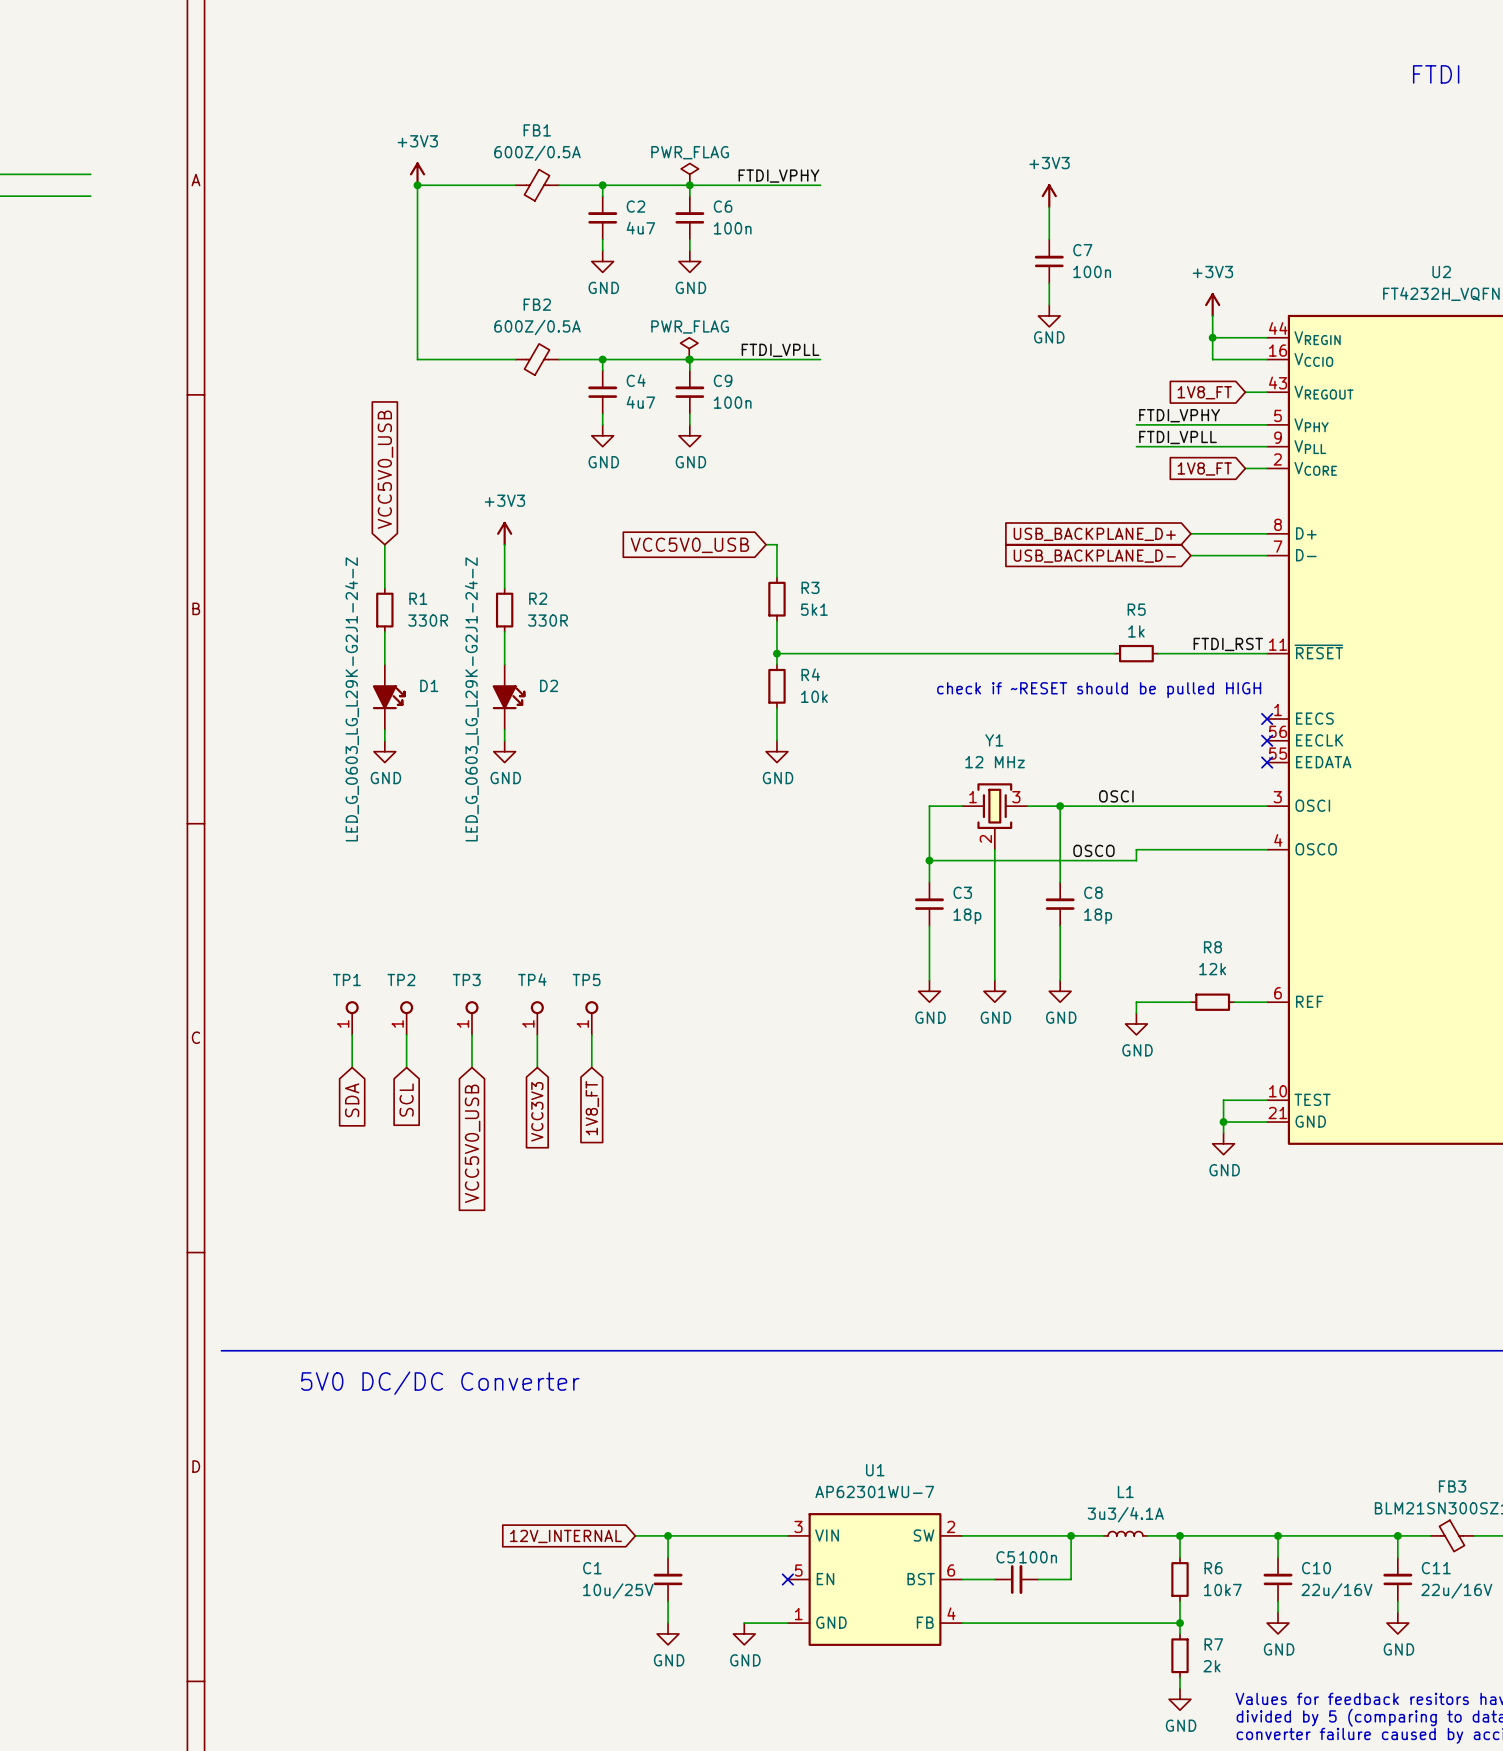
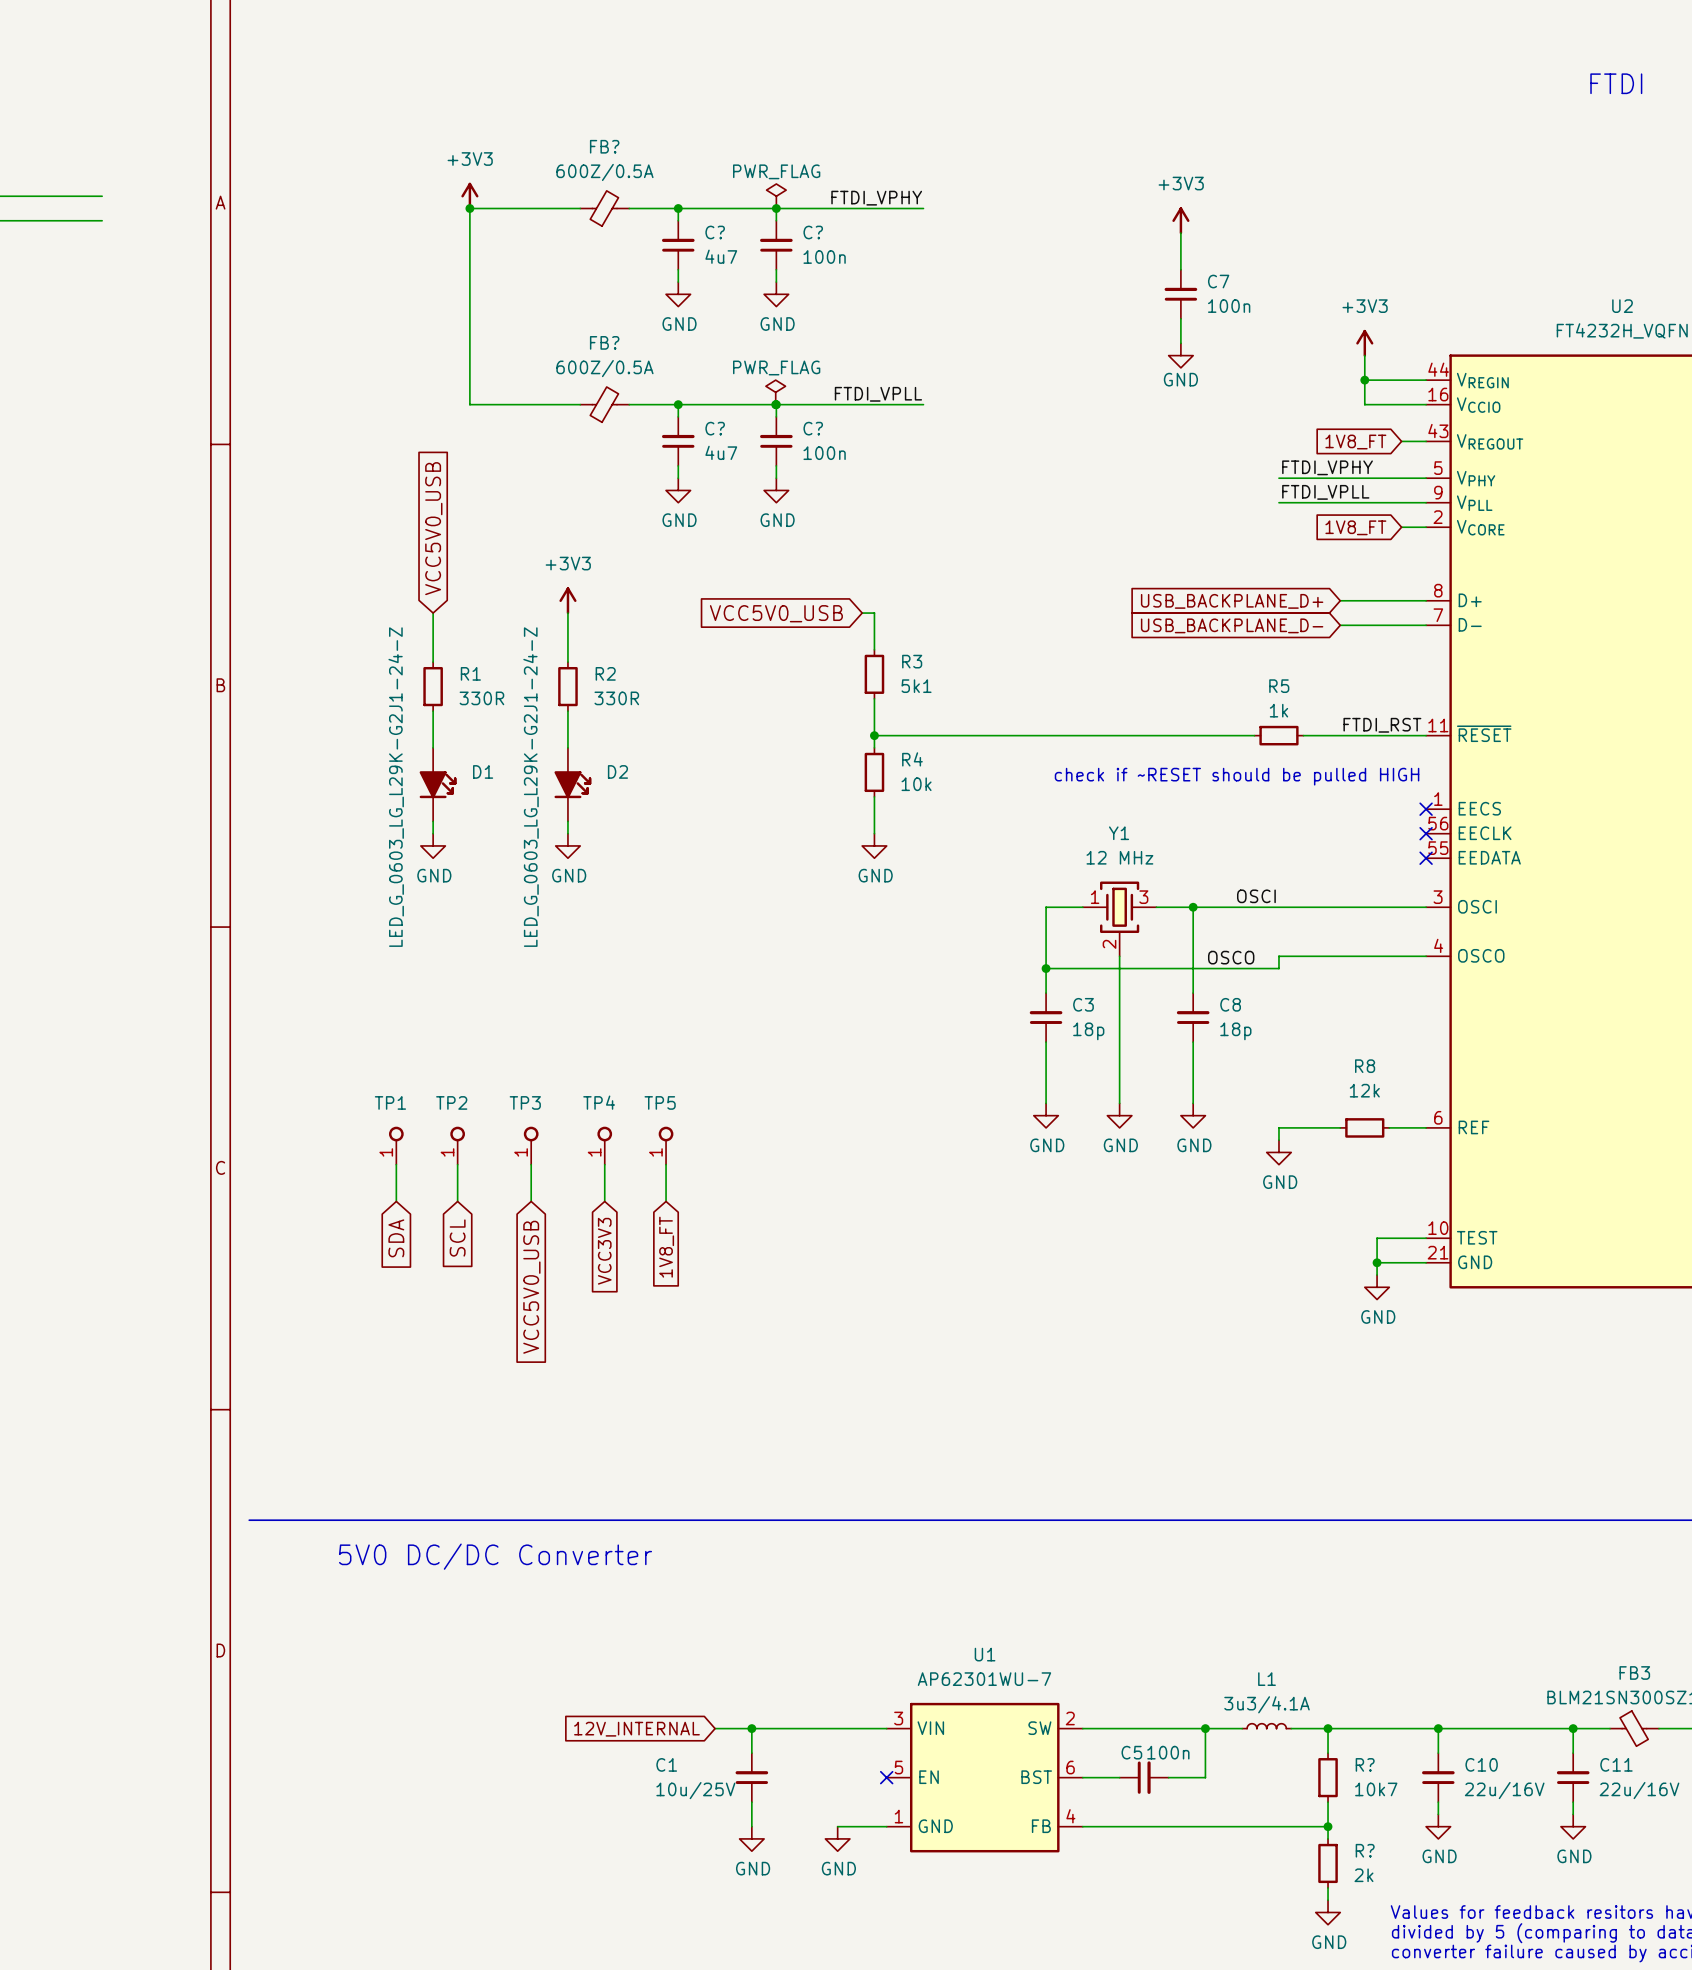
FB1 name: FB1 (537, 130) -> FB? (604, 146)
C2 name: C2 (635, 206) -> C? (715, 232)
C6 name: C6 (723, 206) -> C? (813, 232)
FB2 name: FB2 (537, 304) -> FB? (604, 342)
C4 name: C4 (636, 380) -> C? (715, 428)
C9 name: C9 (723, 380) -> C? (813, 428)
R6 name: R6 (1213, 1568) -> R? (1365, 1764)
R7 name: R7 (1213, 1644) -> R? (1365, 1850)

